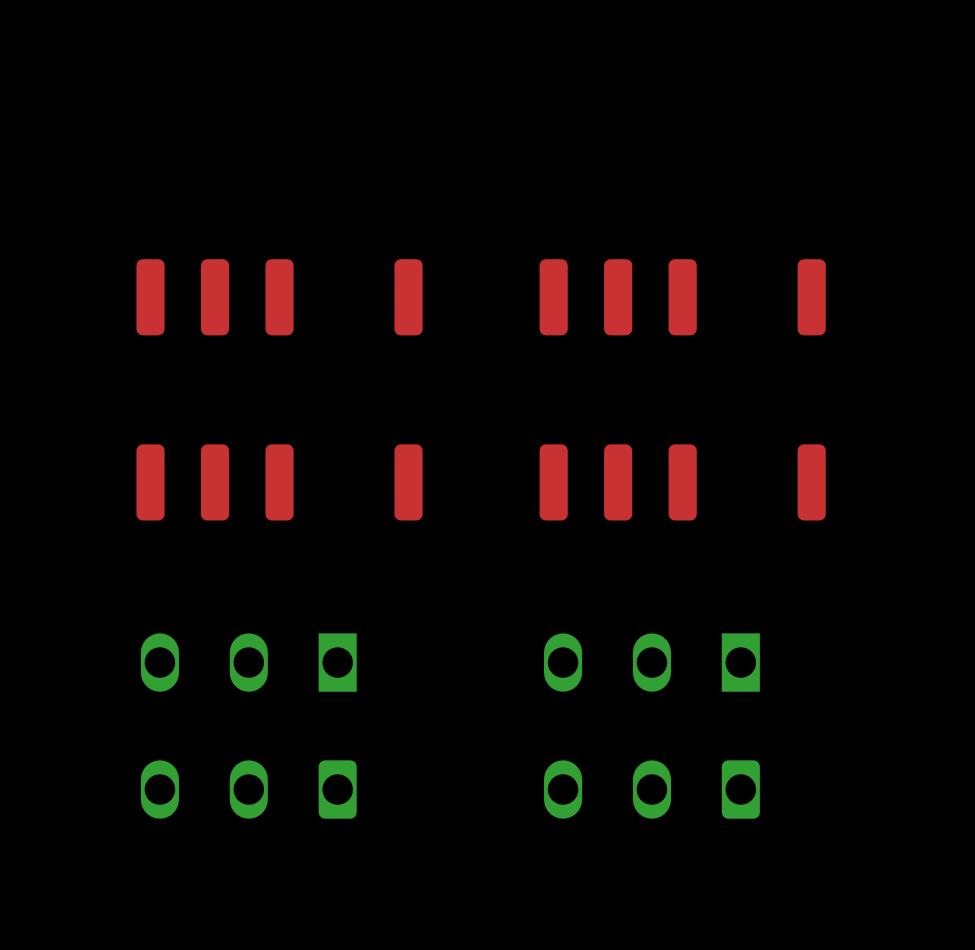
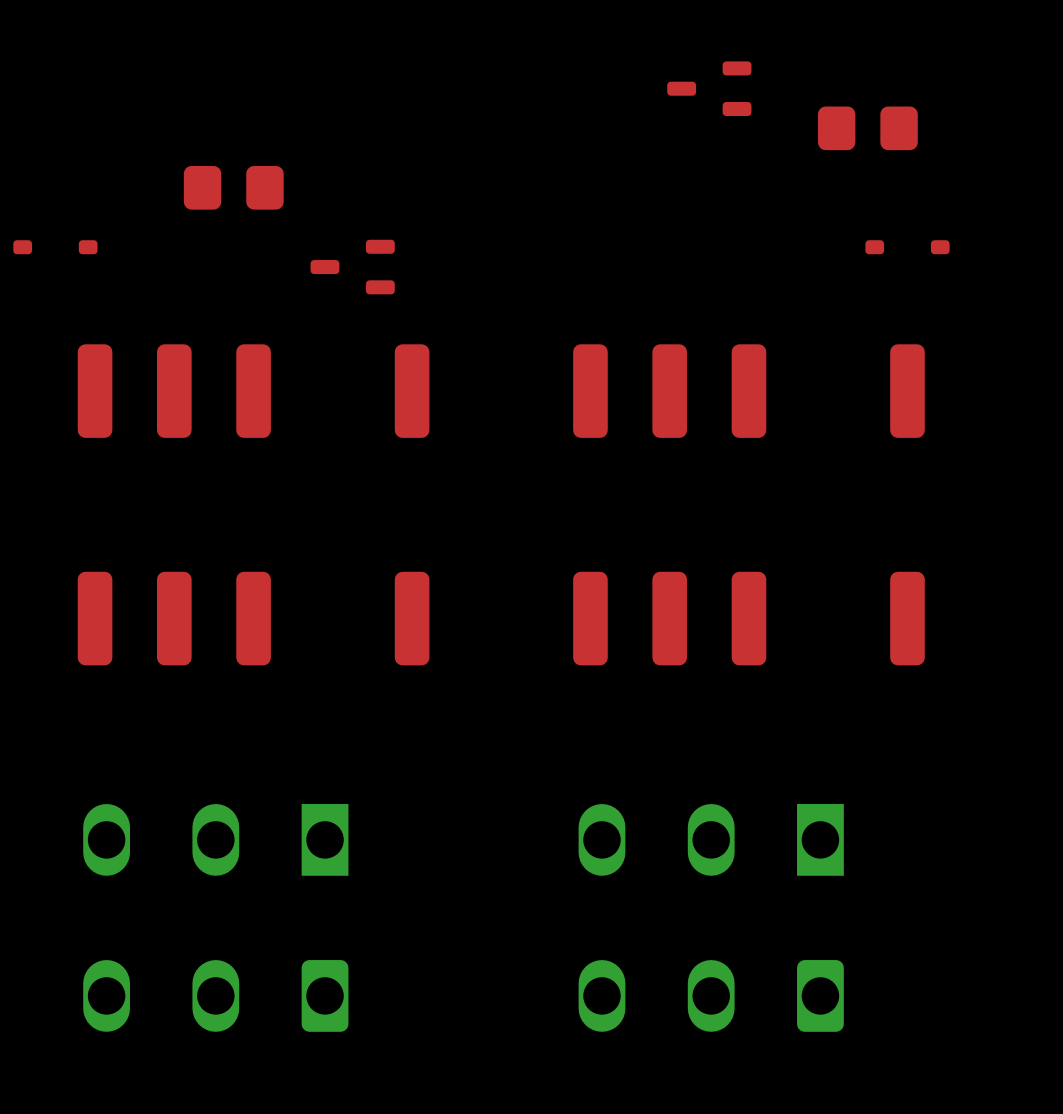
part: none -> (709, 88)
part: none -> (867, 128)
part: none -> (233, 187)
part: none -> (55, 247)
part: none -> (907, 247)
part: none -> (352, 267)

